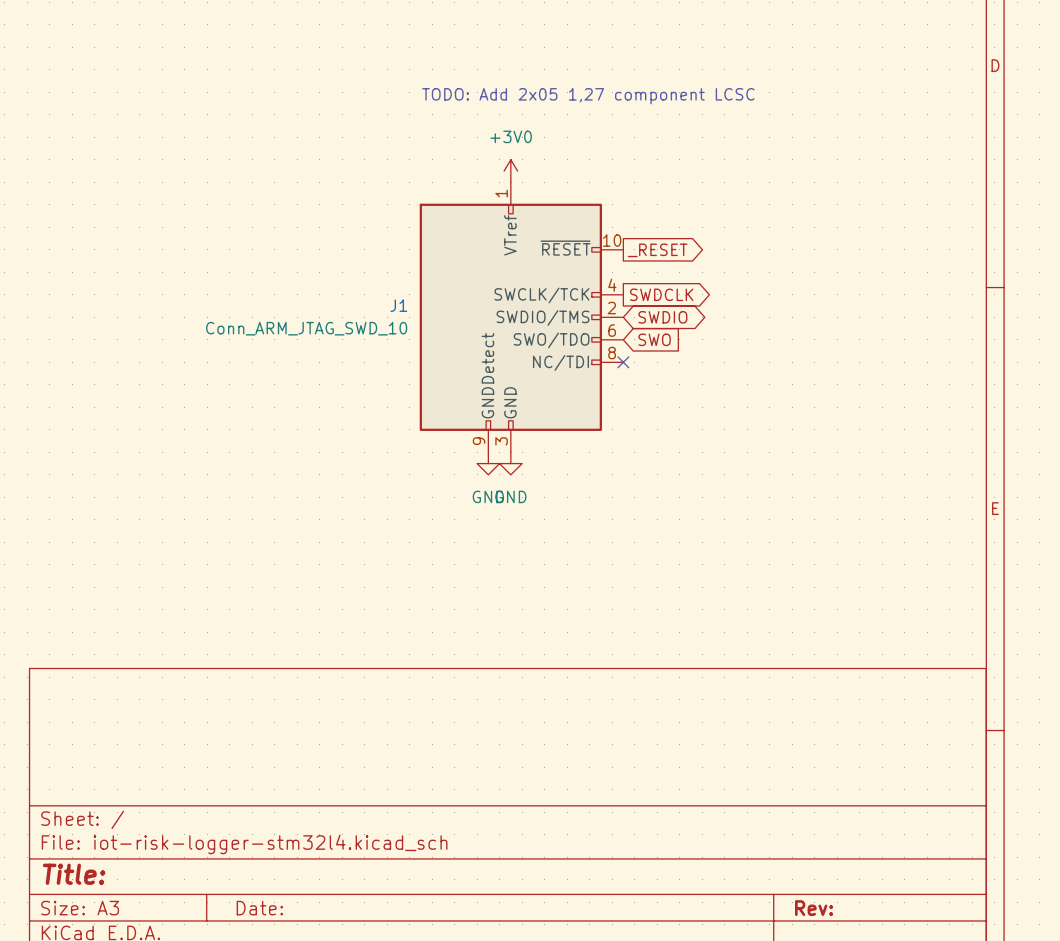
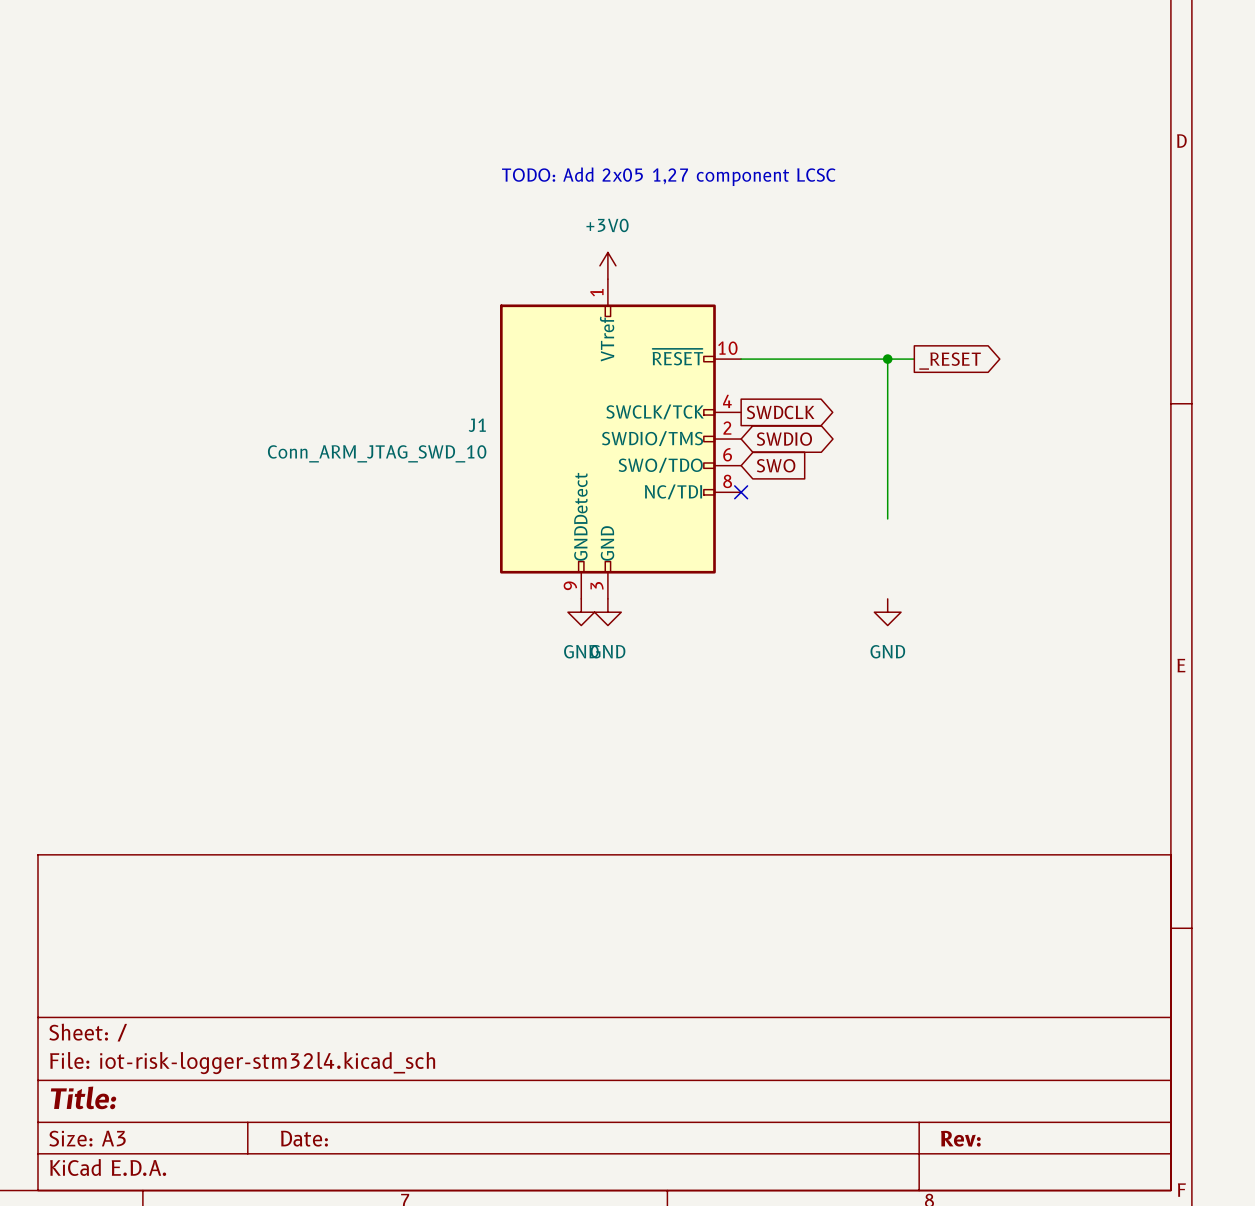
wire: none -> (741, 359) (914, 359)
wire: none -> (887, 359) (887, 518)
junction: none -> (887, 359)
global label position: _RESET (657, 250) -> _RESET (950, 361)
power symbol: none -> GND (887, 612)

